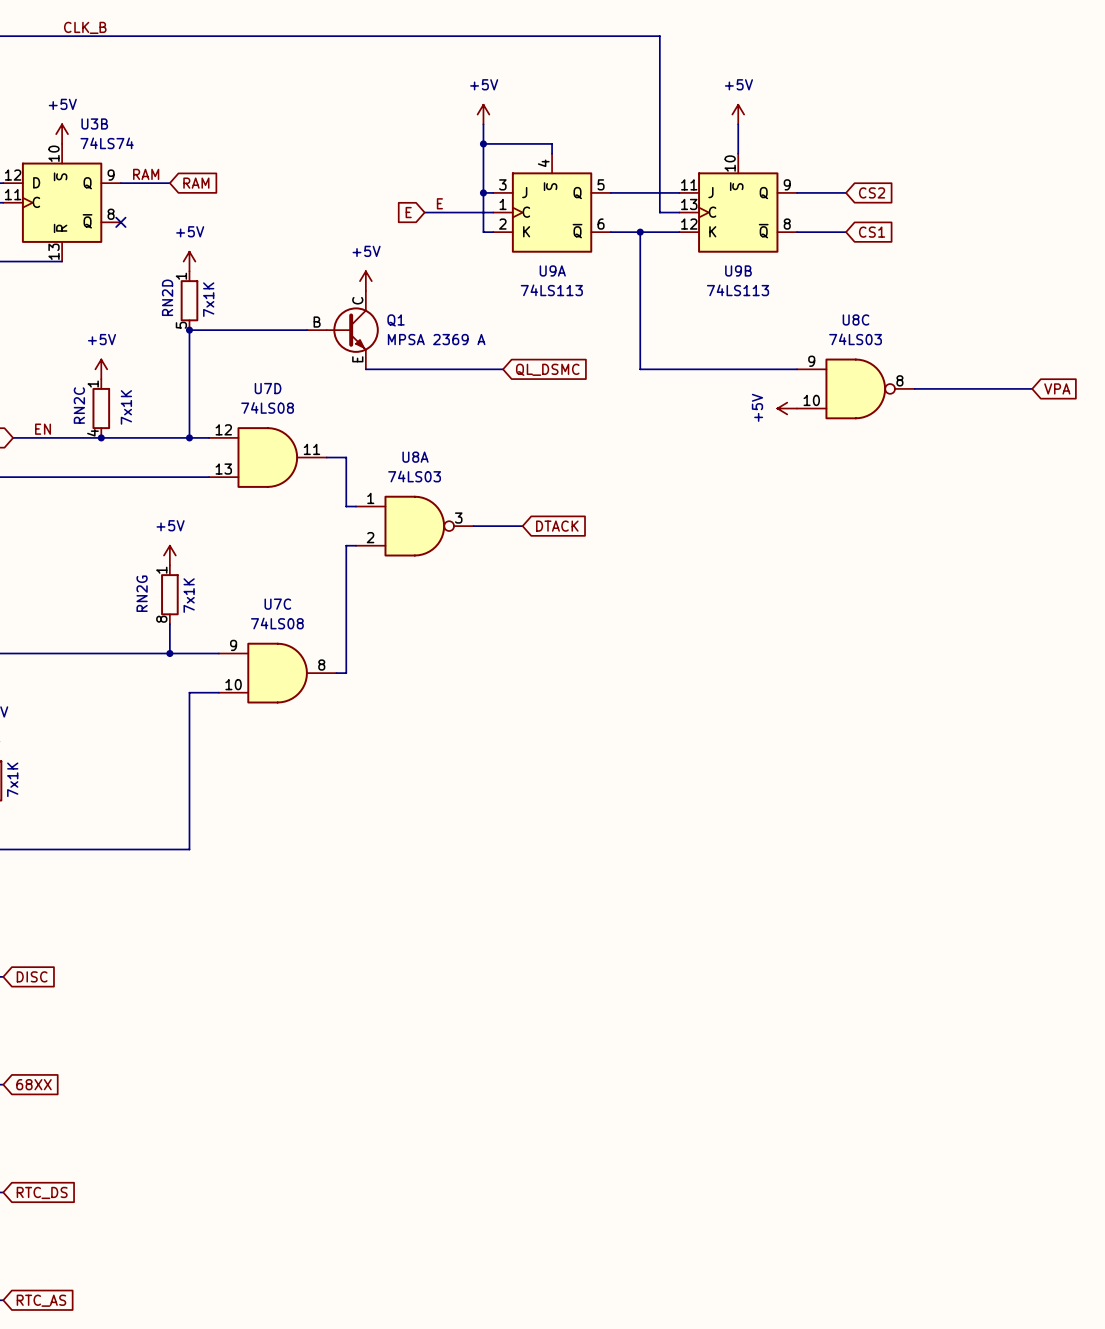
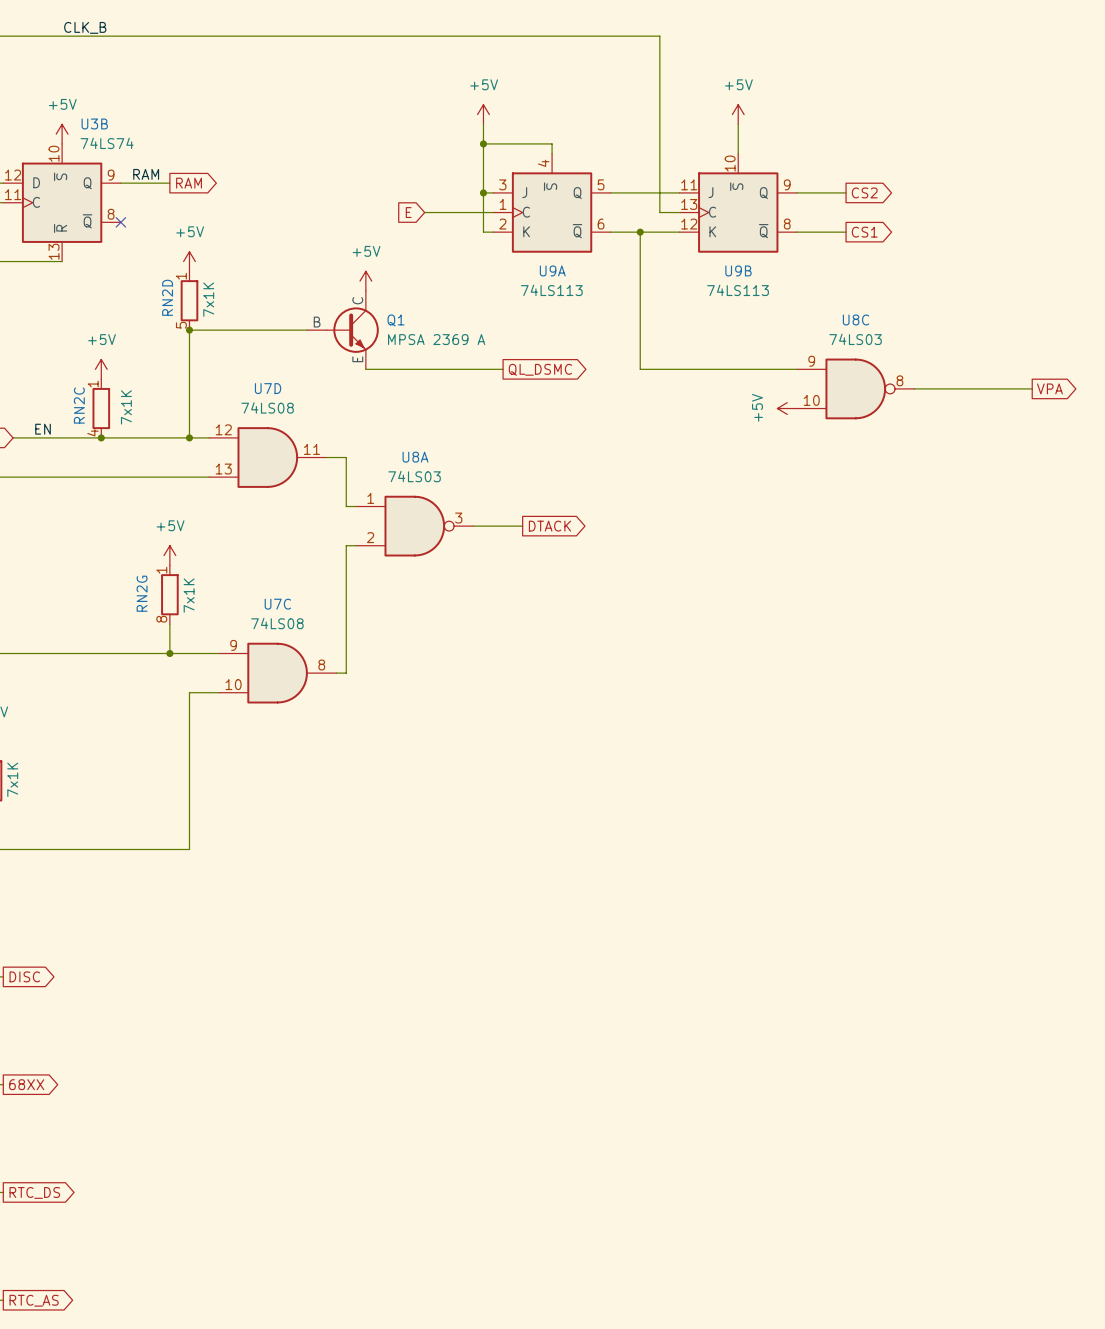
global label shape: input (196, 183) -> output (189, 183)
global label shape: input (872, 192) -> output (864, 192)
label: E (439, 203) -> none
global label shape: input (872, 232) -> output (864, 232)
global label shape: input (547, 369) -> output (540, 369)
global label shape: input (1057, 388) -> output (1049, 388)
global label shape: input (557, 526) -> output (549, 526)
global label shape: input (32, 976) -> output (24, 976)
global label shape: input (34, 1084) -> output (26, 1084)
global label shape: input (42, 1192) -> output (34, 1192)
global label shape: input (41, 1300) -> output (34, 1300)

